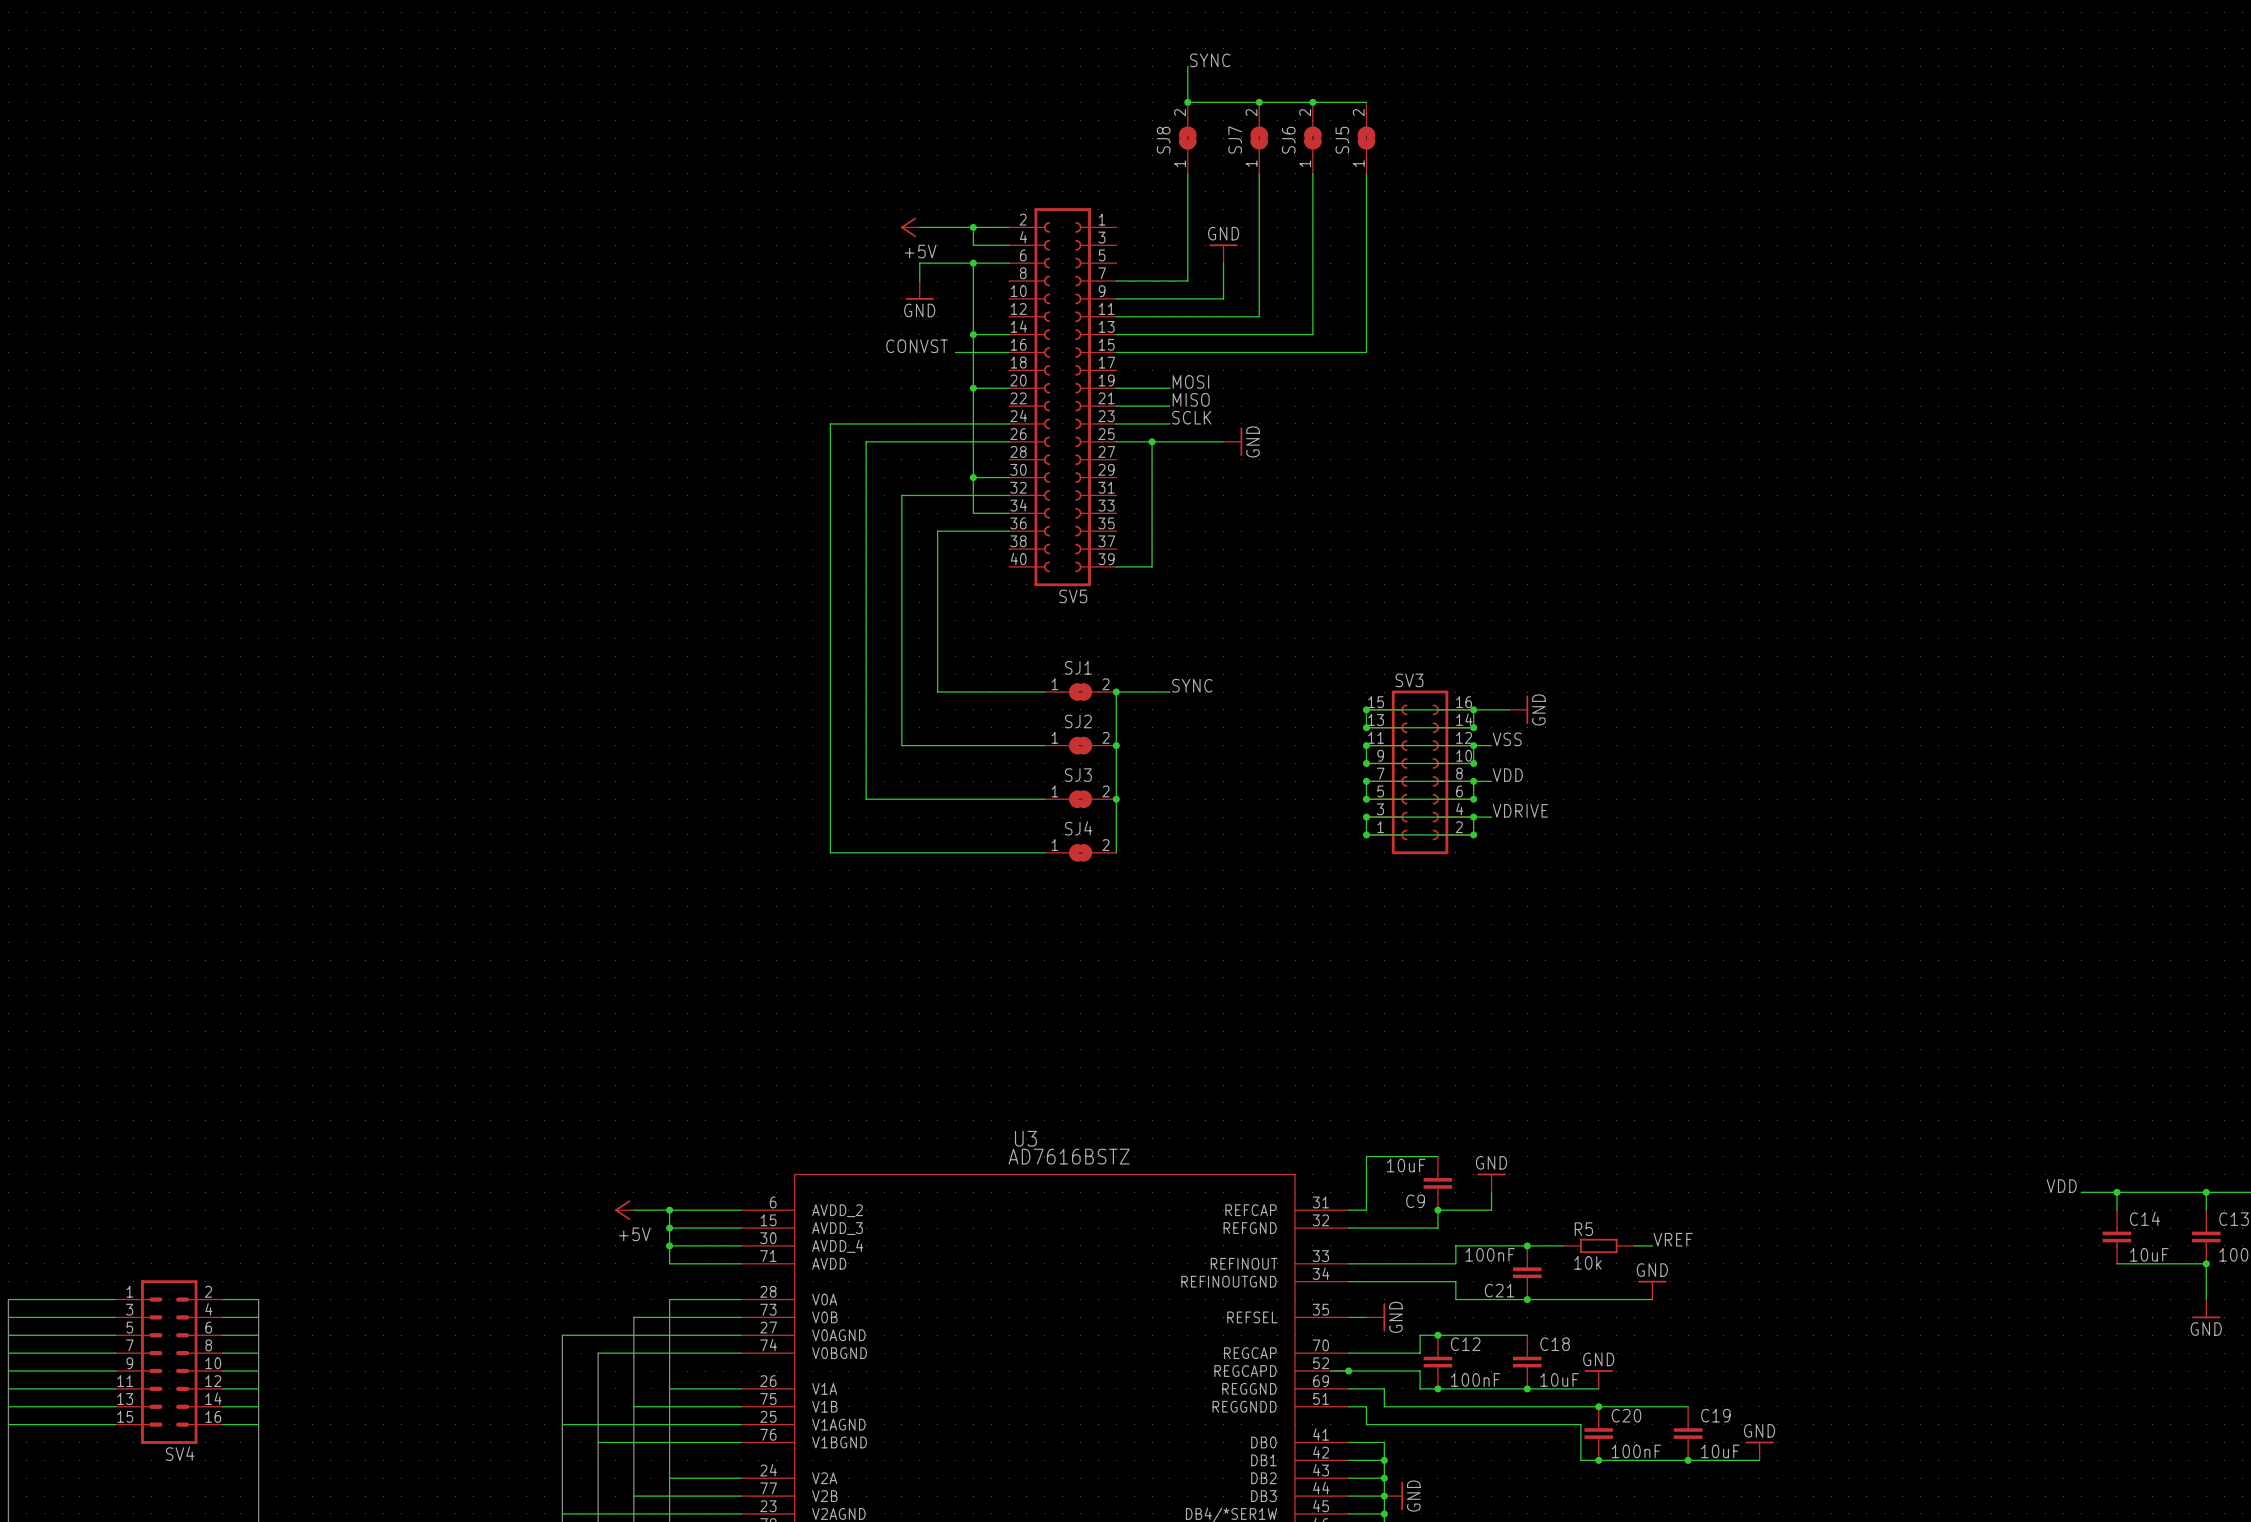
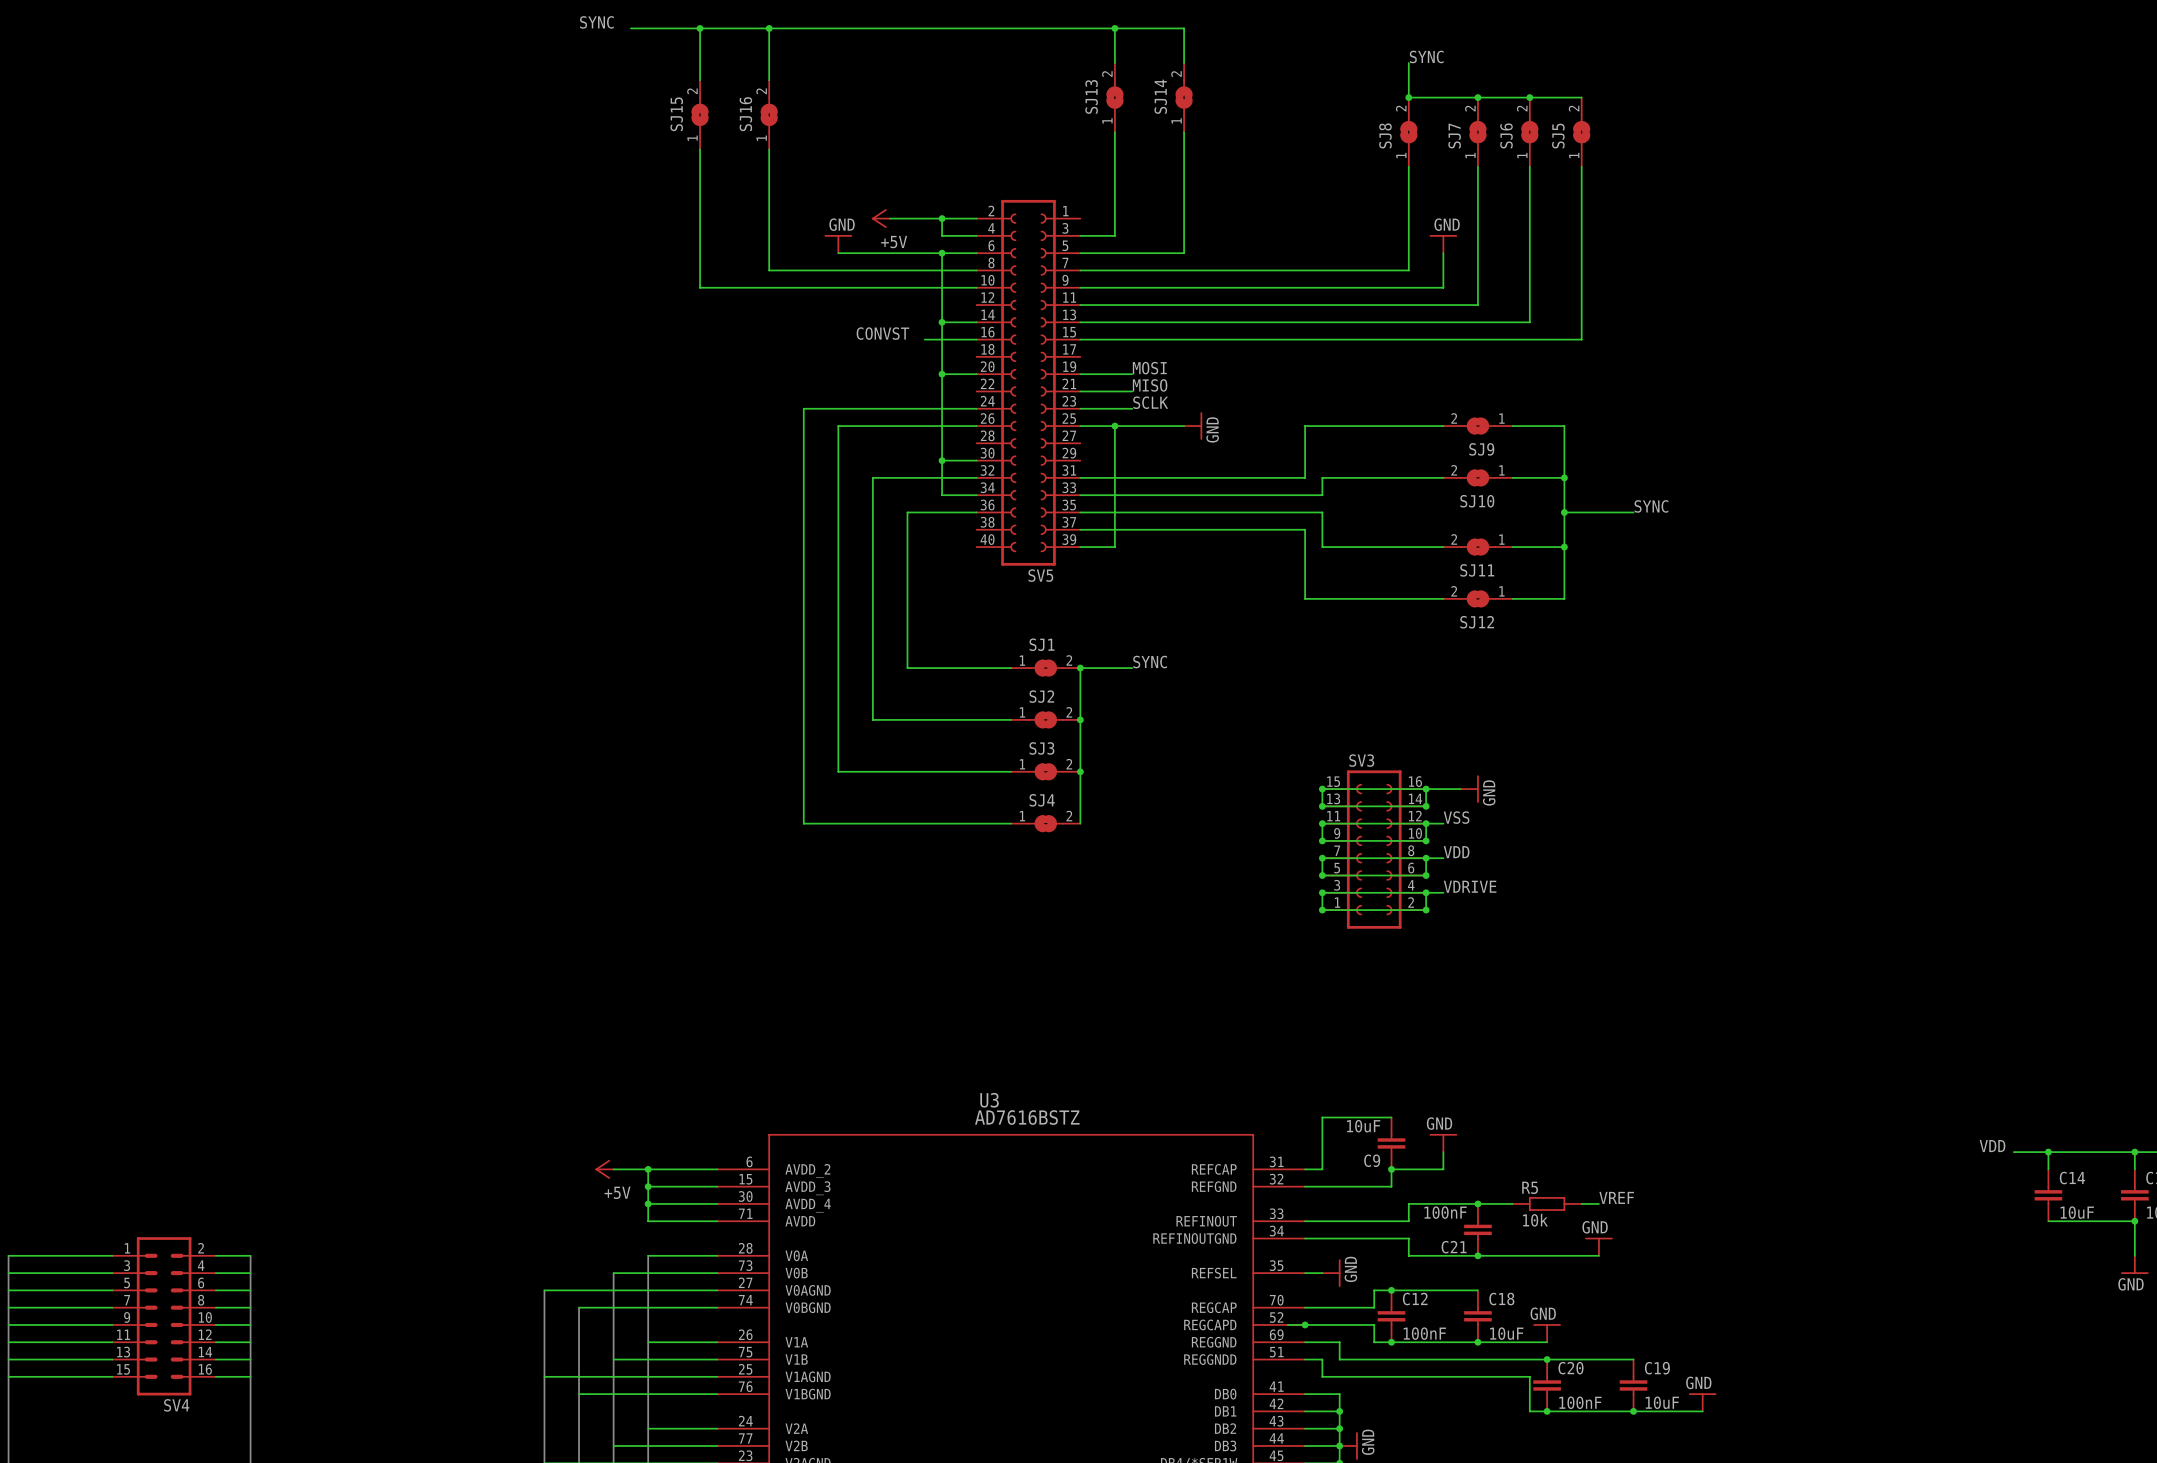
label: none -> SYNC (596, 22)
wire: none -> (630, 28) (1184, 28) (1184, 63)
wire: none -> (700, 28) (700, 80)
junction: none -> (700, 28)
wire: none -> (769, 28) (769, 80)
junction: none -> (769, 28)
wire: none -> (1114, 28) (1114, 63)
junction: none -> (1114, 28)
label: SYNC (1210, 60) -> none
label: none -> SYNC (1426, 56)
wire: (1187, 66) (1187, 102) (1366, 102) -> none
wire: none -> (1408, 63) (1408, 97) (1581, 97)
SJ13: none -> (1114, 97)
junction: (1187, 102) -> none
SJ14: none -> (1184, 97)
junction: (1259, 102) -> none
junction: (1312, 102) -> none
junction: none -> (1408, 97)
junction: none -> (1477, 97)
junction: none -> (1529, 97)
SJ15: none -> (700, 114)
SJ16: none -> (769, 114)
wire: none -> (1114, 132) (1114, 235) (1080, 235)
SJ8 position: (1187, 138) -> (1408, 132)
wire: none -> (1184, 132) (1184, 253) (1080, 253)
SJ7 position: (1259, 138) -> (1477, 132)
SJ6 position: (1312, 138) -> (1529, 132)
SJ5 position: (1366, 138) -> (1581, 132)
wire: none -> (700, 149) (700, 287) (976, 287)
wire: none -> (769, 149) (769, 270) (976, 270)
wire: (1187, 173) (1187, 281) -> (1408, 166) (1408, 270) (1149, 270)
wire: (1259, 173) (1259, 316) -> (1477, 166) (1477, 305) (1218, 305)
wire: (1312, 173) (1312, 334) -> (1529, 166) (1529, 322) (1270, 322)
wire: (1366, 173) (1366, 352) -> (1581, 166) (1581, 339) (1322, 339)
power symbol: GND (1223, 253) -> none
power symbol: none -> GND (1443, 244)
wire: (919, 263) (919, 281) -> (890, 253) (838, 253)
wire: (1223, 263) (1223, 298) -> (1443, 253) (1443, 287) (1184, 287)
power symbol position: GND (919, 290) -> GND (838, 244)
power symbol rotation: 0° (919, 298) -> 180° (838, 235)
wire: none -> (1443, 426) (1305, 426) (1305, 477) (1080, 477)
SJ9: none -> (1477, 426)
wire: none -> (1512, 426) (1564, 426) (1564, 598) (1512, 598)
wire: none -> (1443, 477) (1322, 477) (1322, 495) (1080, 495)
SJ10: none -> (1477, 477)
wire: none -> (1512, 477) (1564, 477)
junction: none -> (1564, 477)
label: none -> SYNC (1651, 506)
wire: none -> (1080, 512) (1322, 512) (1322, 547) (1443, 547)
wire: none -> (1564, 512) (1633, 512)
junction: none -> (1564, 512)
wire: none -> (1080, 529) (1305, 529) (1305, 598) (1443, 598)
SJ11: none -> (1477, 547)
wire: none -> (1512, 547) (1564, 547)
junction: none -> (1564, 547)
SJ12: none -> (1477, 598)
junction: (1366, 709) -> none
wire: (1473, 709) (1473, 727) (1366, 727) (1366, 709) (1509, 709) -> none
junction: (1473, 709) -> none
power symbol position: GND (1518, 709) -> GND (1469, 789)
junction: (1366, 727) -> none
junction: (1473, 727) -> none
label position: VSS (1507, 739) -> VSS (1456, 817)
junction: (1366, 745) -> none
wire: (1473, 745) (1473, 763) (1366, 763) (1366, 745) (1491, 745) -> (1426, 823) (1426, 840) (1322, 840) (1322, 823) (1443, 823)
junction: (1473, 745) -> none
junction: (1366, 763) -> none
junction: (1473, 763) -> none
SV3 position: (1420, 772) -> (1374, 849)
label position: VDD (1507, 775) -> VDD (1456, 852)
junction: (1366, 781) -> none
wire: (1473, 781) (1473, 799) (1366, 799) (1366, 781) (1491, 781) -> (1426, 858) (1426, 875) (1322, 875) (1322, 858) (1443, 858)
junction: (1473, 781) -> none
junction: (1366, 799) -> none
junction: (1473, 799) -> none
label position: VDRIVE (1520, 810) -> VDRIVE (1470, 886)
wire: none -> (1443, 789) (1460, 789)
junction: none -> (1322, 823)
junction: none -> (1426, 823)
junction: none -> (1322, 840)
junction: none -> (1426, 840)
junction: none -> (1322, 858)
junction: none -> (1426, 858)
junction: none -> (1322, 875)
junction: none -> (1426, 875)
junction: none -> (1322, 892)
wire: none -> (1426, 892) (1426, 910) (1322, 910) (1322, 892) (1443, 892)
junction: none -> (1426, 892)
junction: none -> (1322, 910)
junction: none -> (1426, 910)

